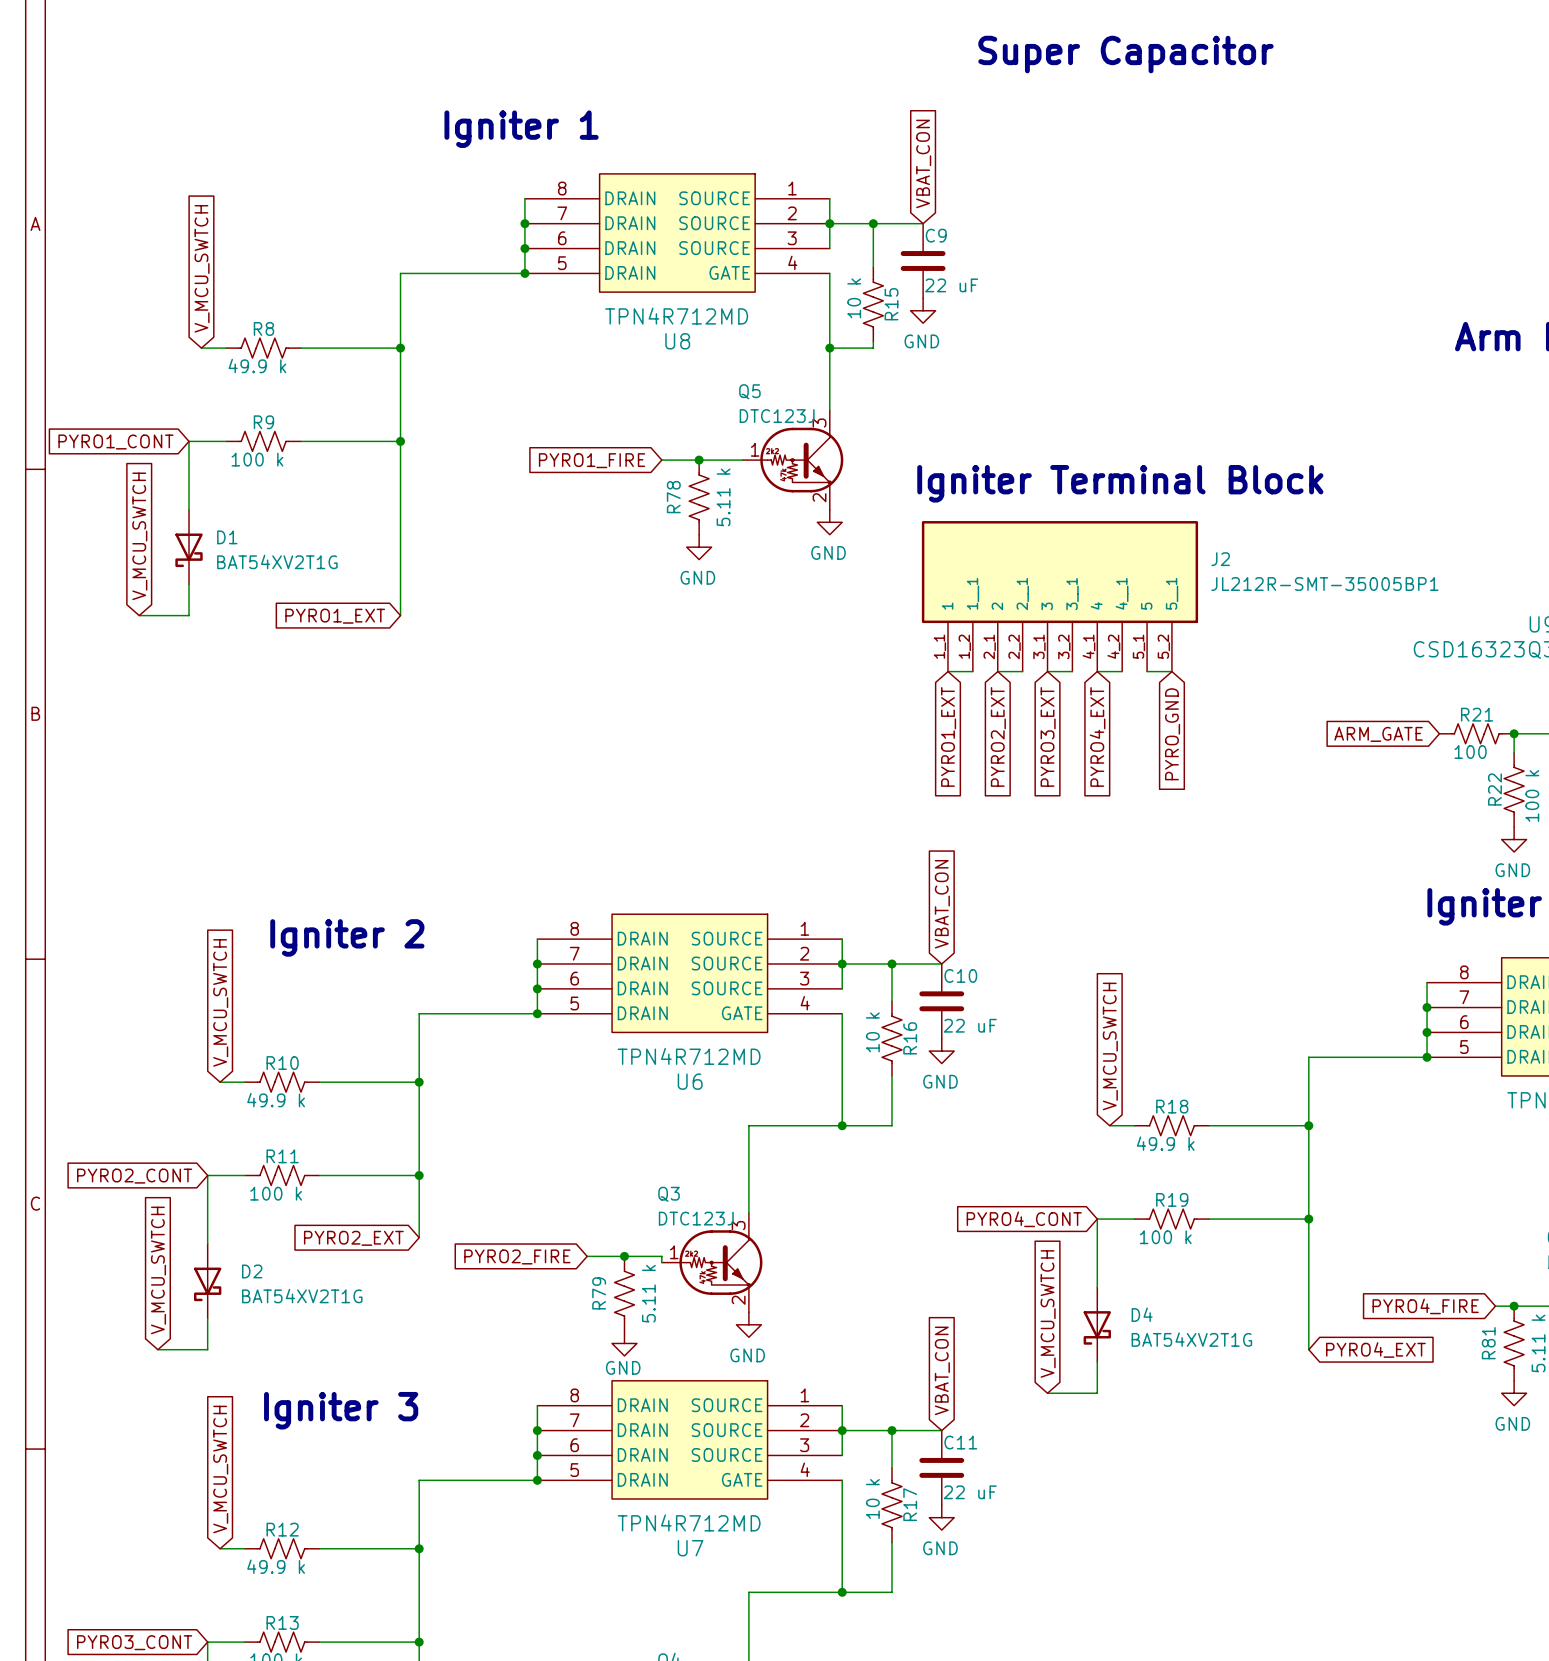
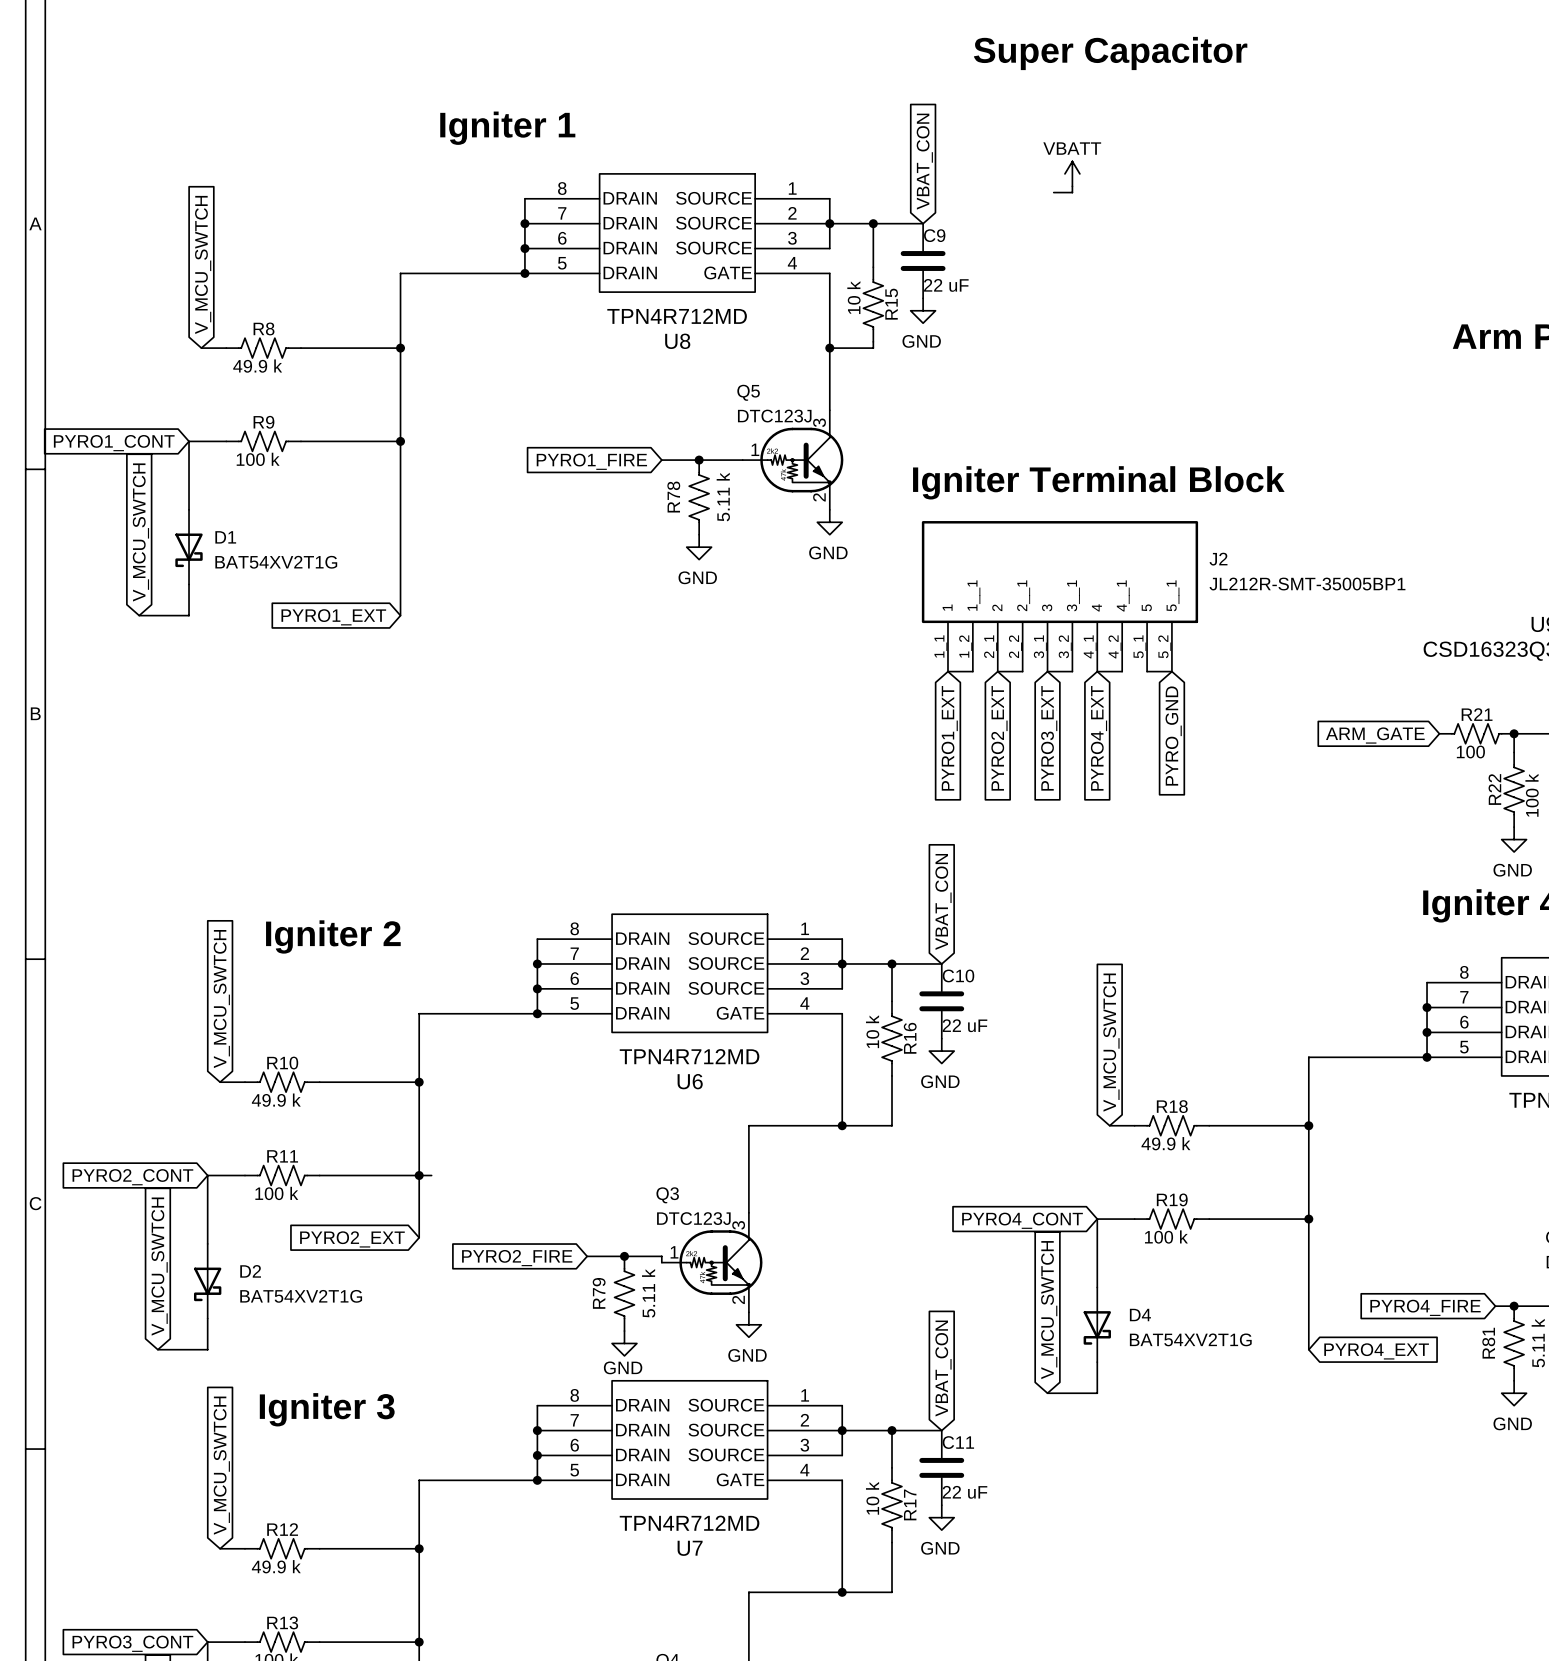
power symbol: none -> VBATT (1072, 173)
wire: none -> (1072, 186) (1072, 192) (1053, 192)
wire: none -> (419, 1175) (431, 1175)

